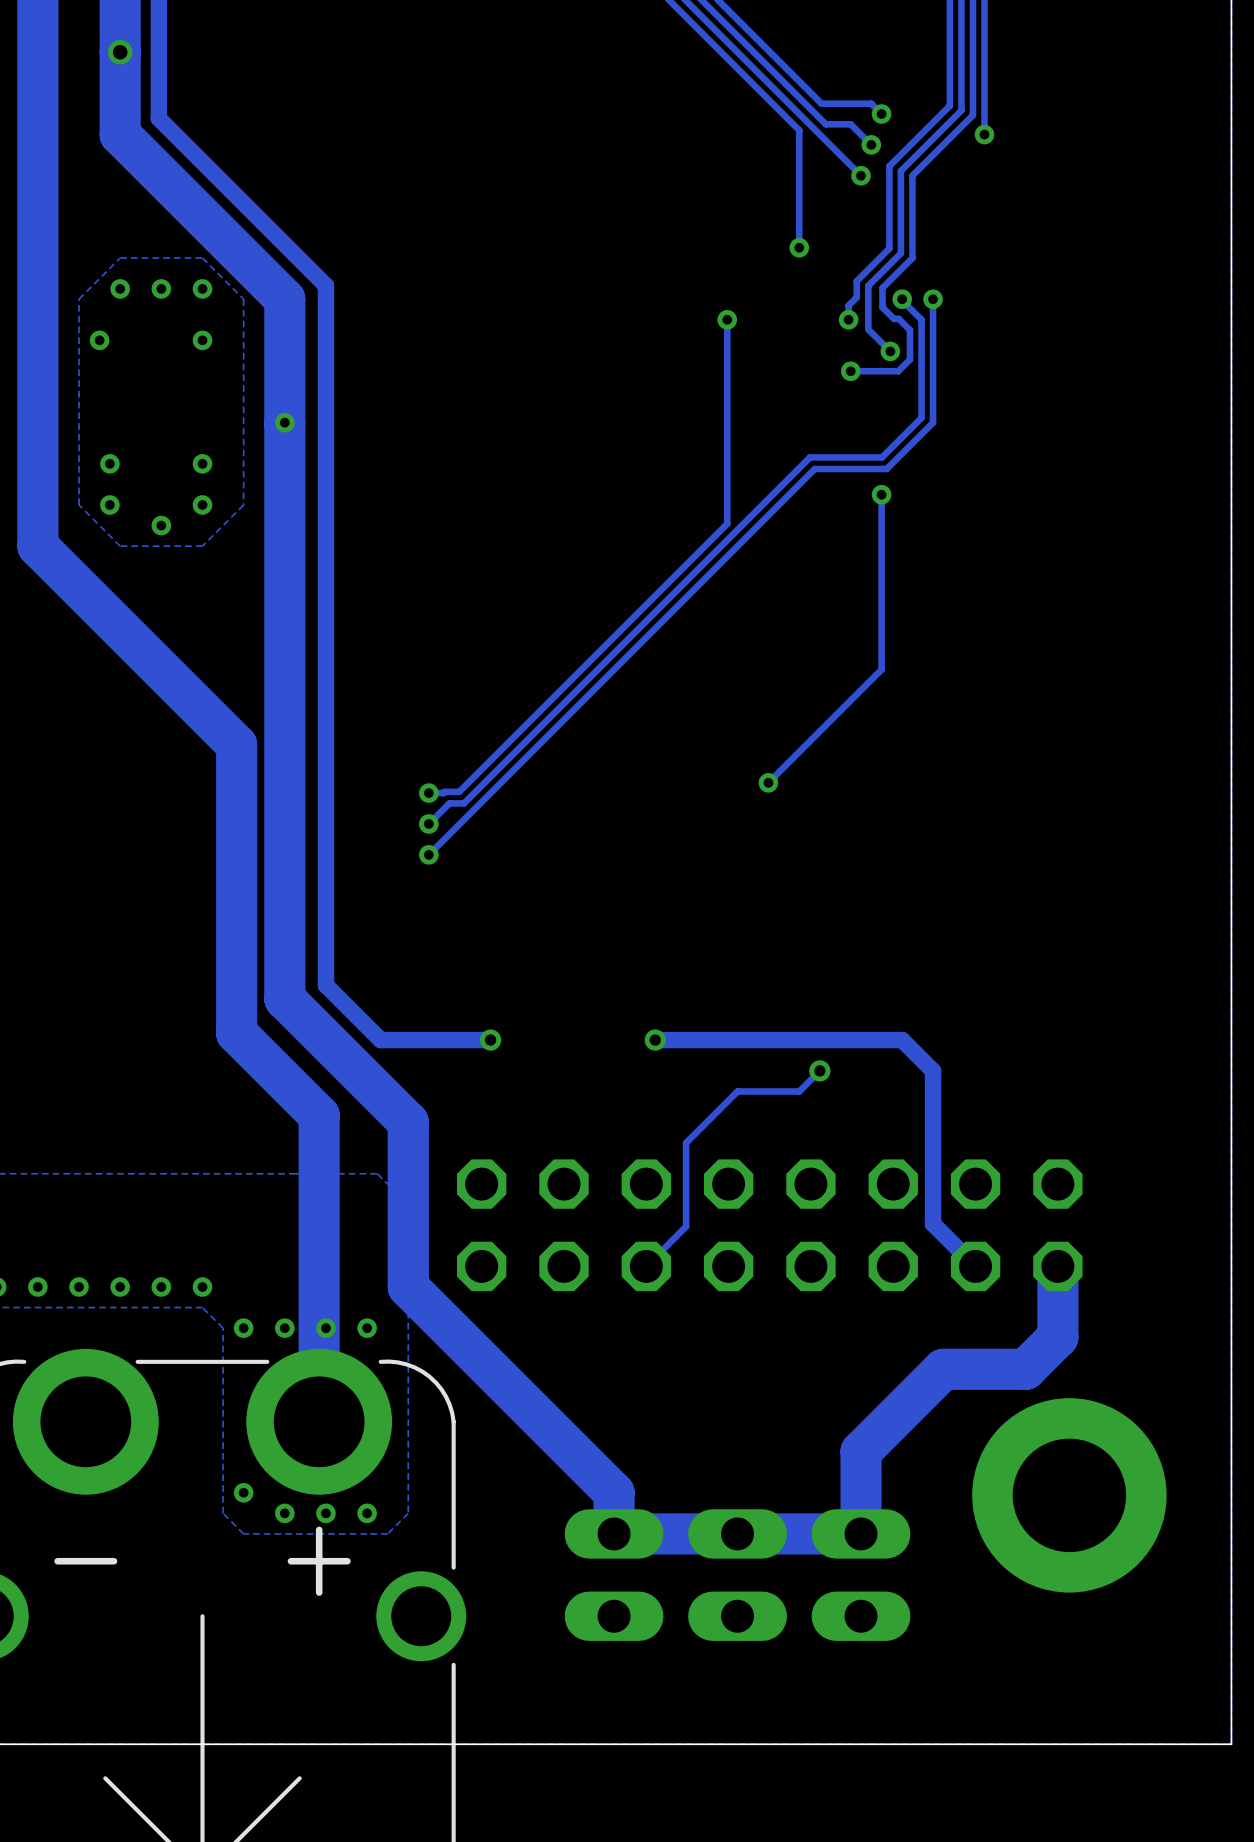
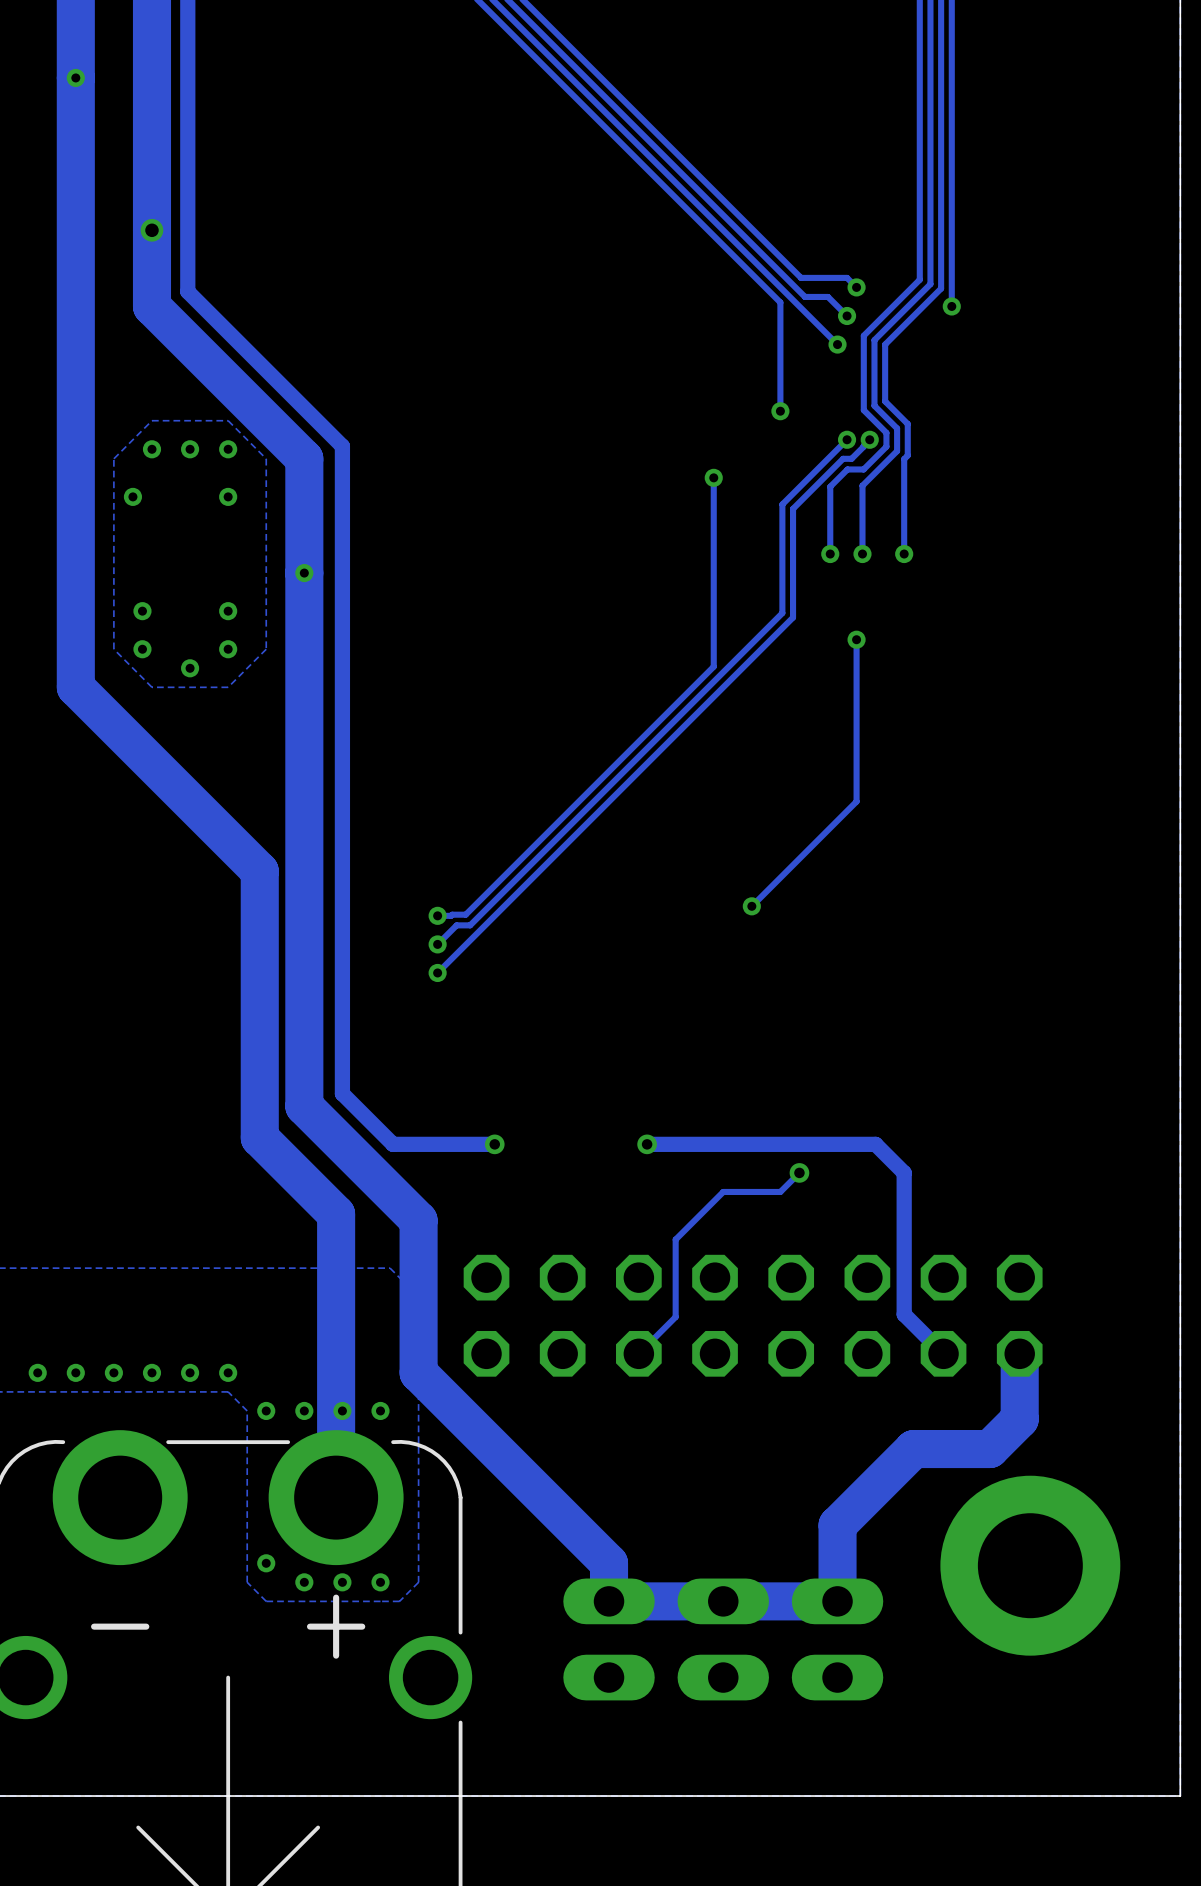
track: (912, 237) (912, 258) (882, 288) (882, 307) (894, 318) (898, 318) (909, 330) (909, 359) (898, 371) (850, 371) -> (885, 401) (907, 424) (907, 455) (904, 459)
track: (900, 241) (900, 253) (868, 285) (868, 329) (890, 351) -> (874, 405) (897, 428) (897, 451) (862, 485) (862, 554)
track: (889, 246) (856, 281) (856, 297) (848, 305) (848, 319) -> (863, 410) (886, 432) (886, 446) (863, 469) (847, 469) (830, 486) (830, 554)
via: none -> (847, 439)
via: none -> (869, 439)
track: (902, 299) (921, 319) (921, 417) (881, 457) (809, 457) (801, 465) -> (847, 439) (782, 504) (782, 613)
via: (902, 299) -> none
via: (933, 299) -> none
via: (848, 319) -> none
via: (890, 351) -> none
via: (850, 371) -> none
via: none -> (830, 554)
via: none -> (862, 554)
track: (933, 402) (933, 422) (886, 468) (814, 468) (812, 470) -> (869, 439) (851, 458) (843, 458) (793, 508) (793, 617)
via: none -> (904, 554)

